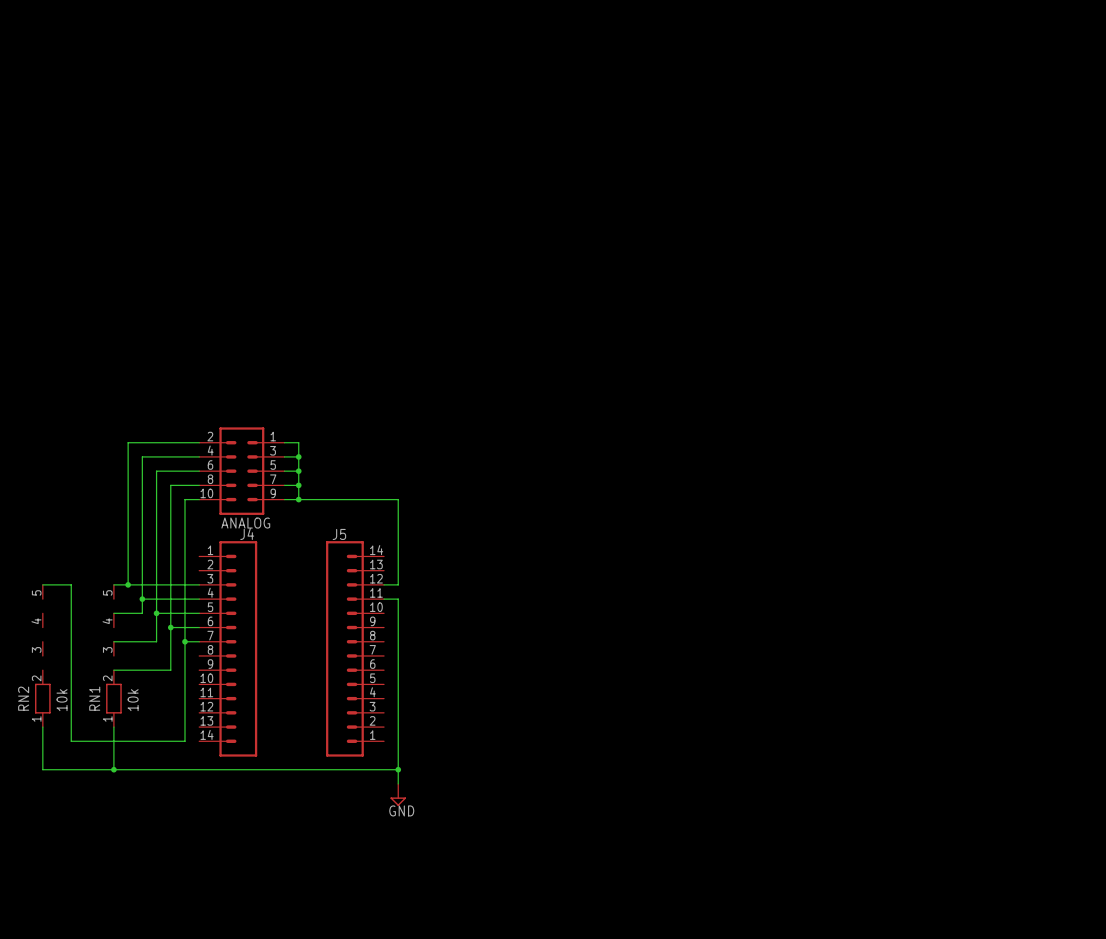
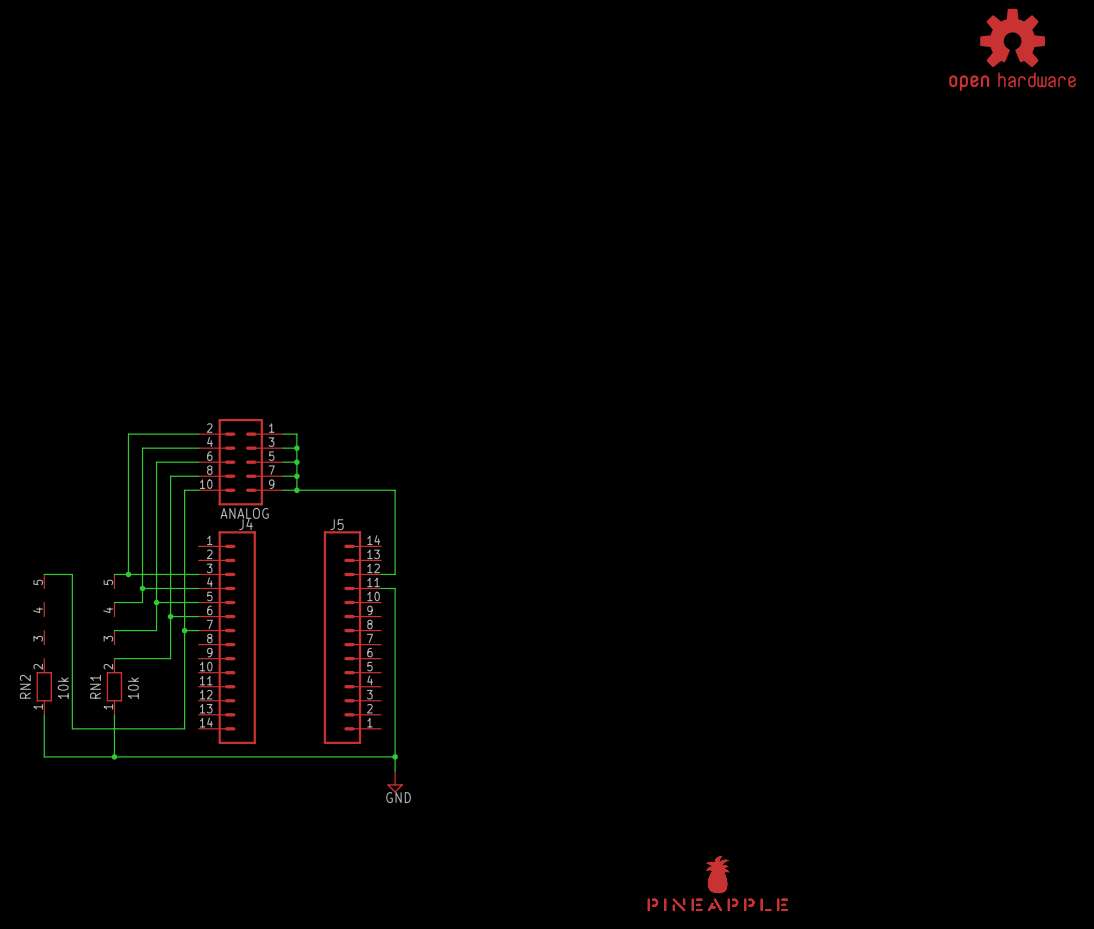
part: none -> (1012, 49)
part: none -> (717, 883)

